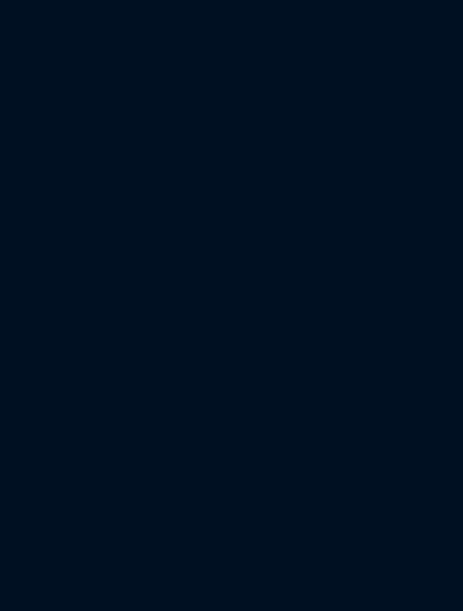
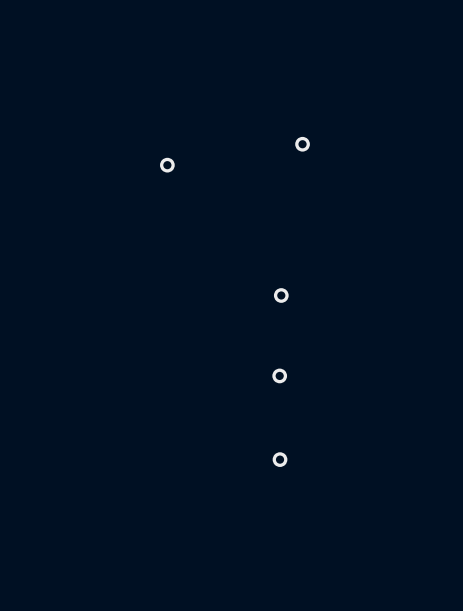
via: none -> (302, 144)
via: none -> (167, 165)
via: none -> (281, 295)
via: none -> (279, 375)
via: none -> (280, 459)

